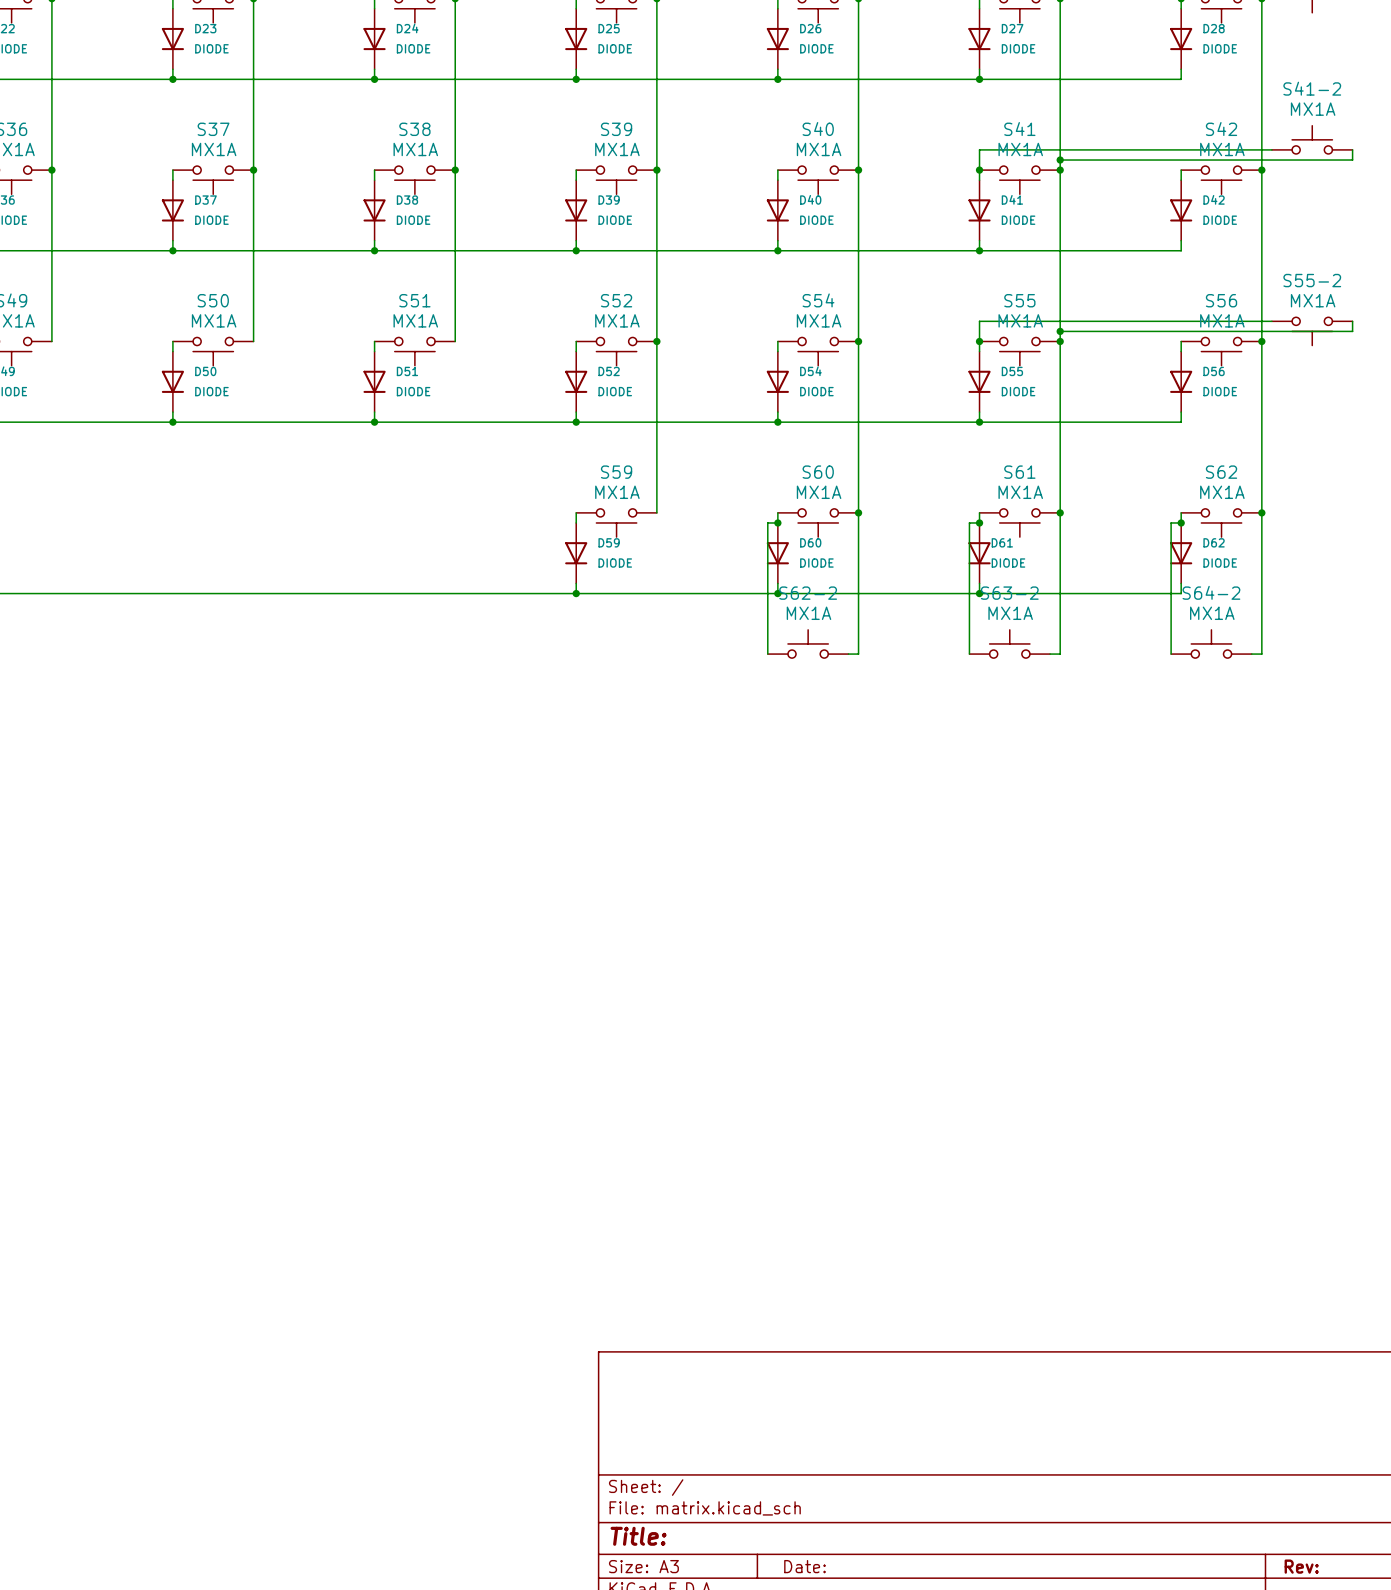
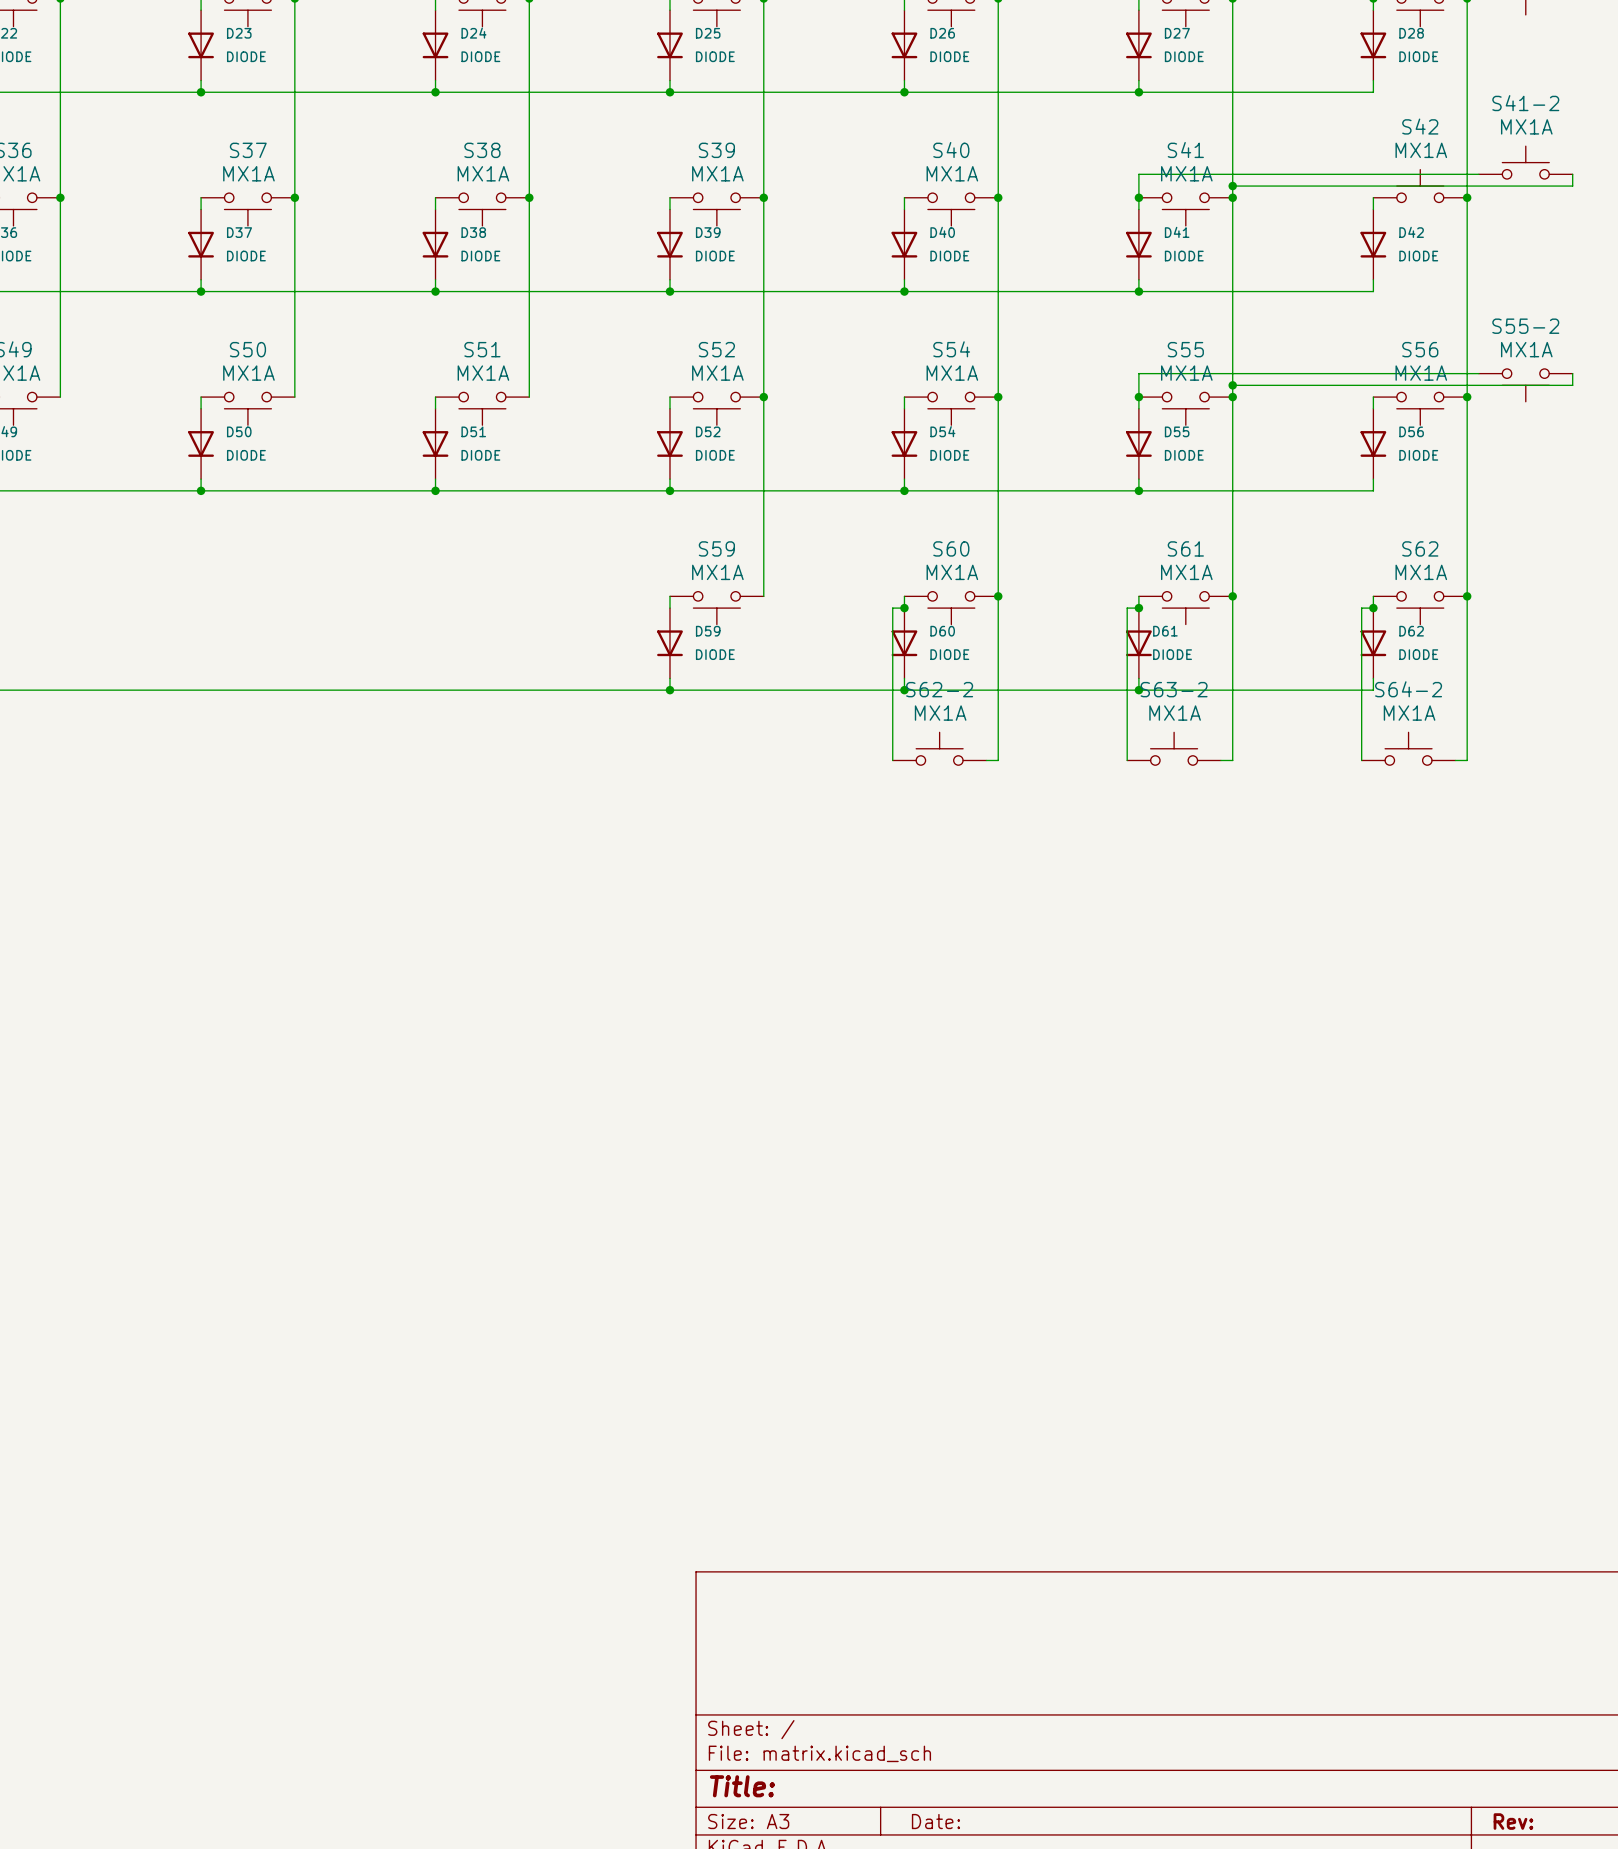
S42 rotation: 0° (1221, 180) -> 180° (1420, 186)

